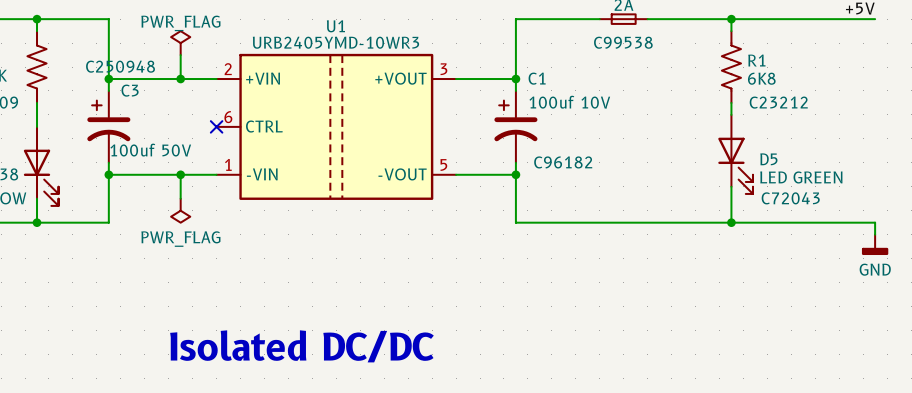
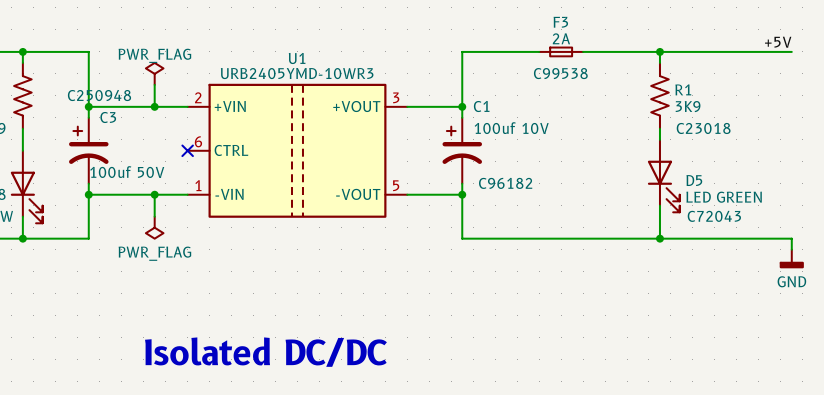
R1 value: 6K8 (761, 78) -> 3K9 (688, 106)
R1 text: C23212 (778, 102) -> C23018 (703, 128)

